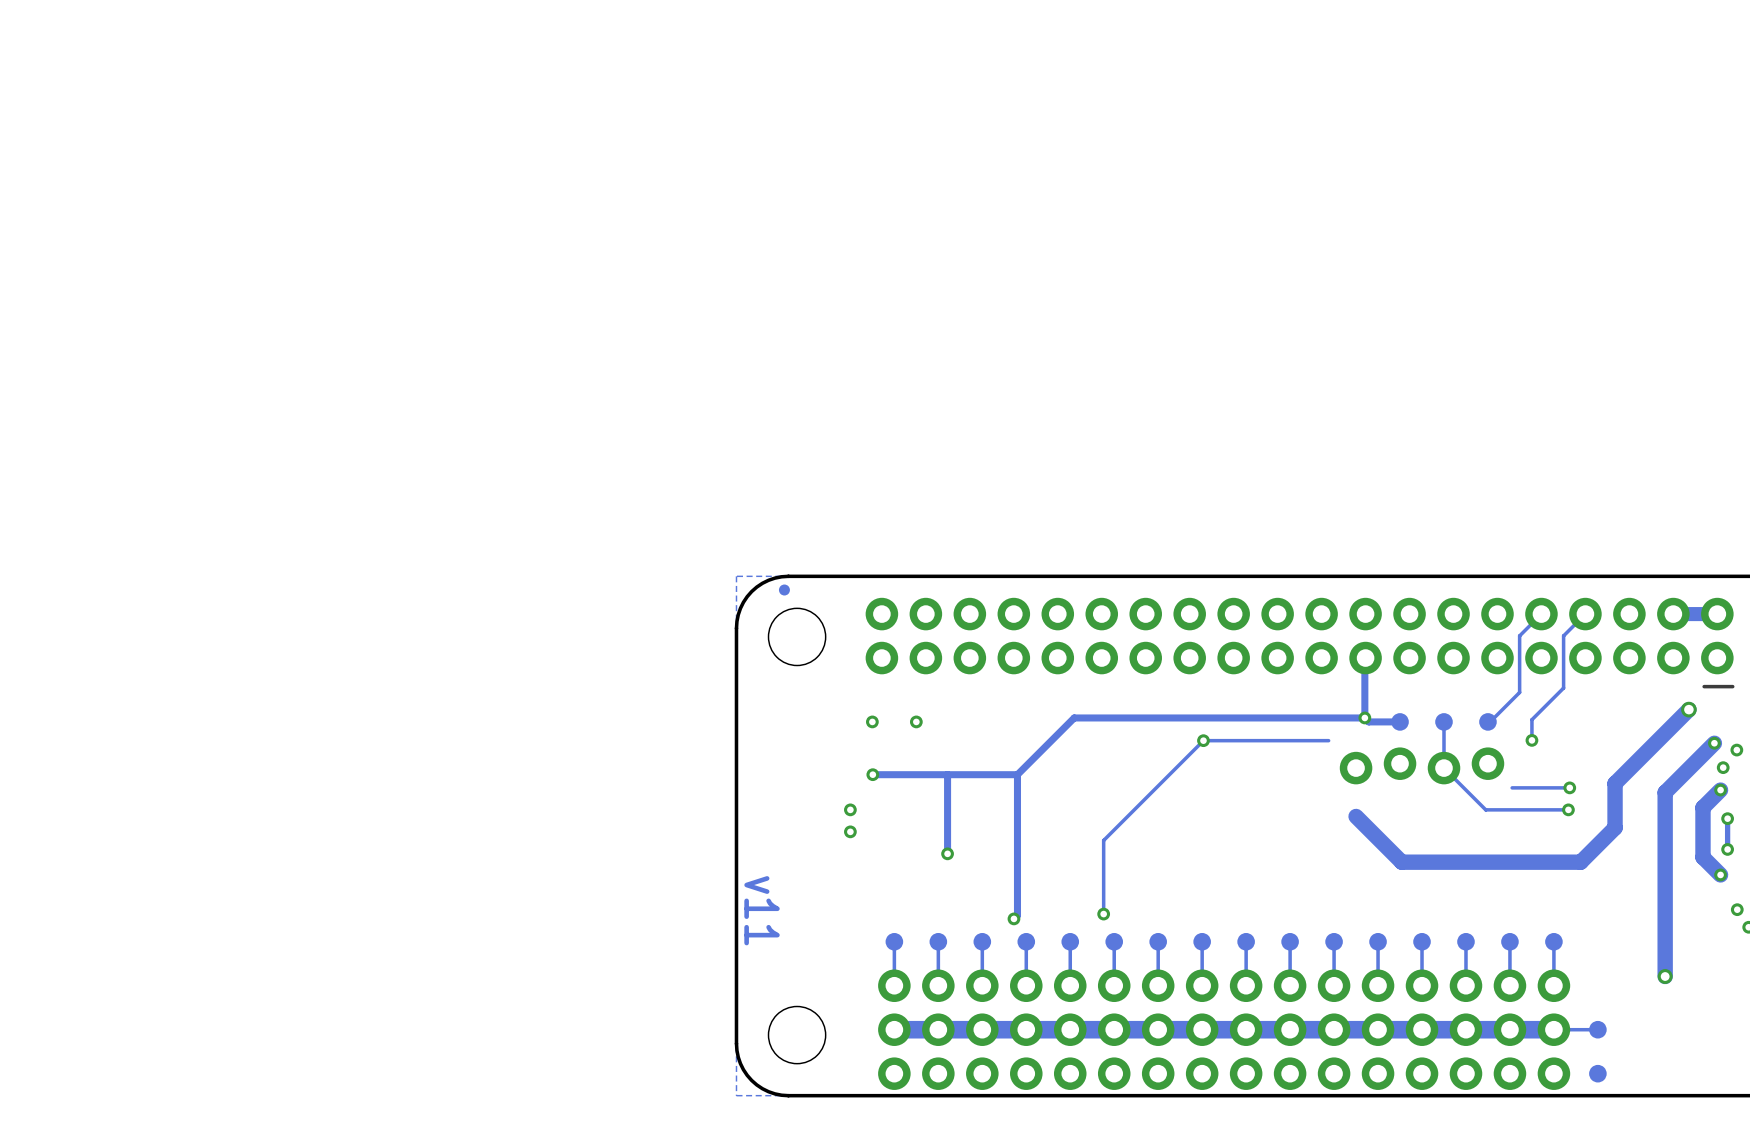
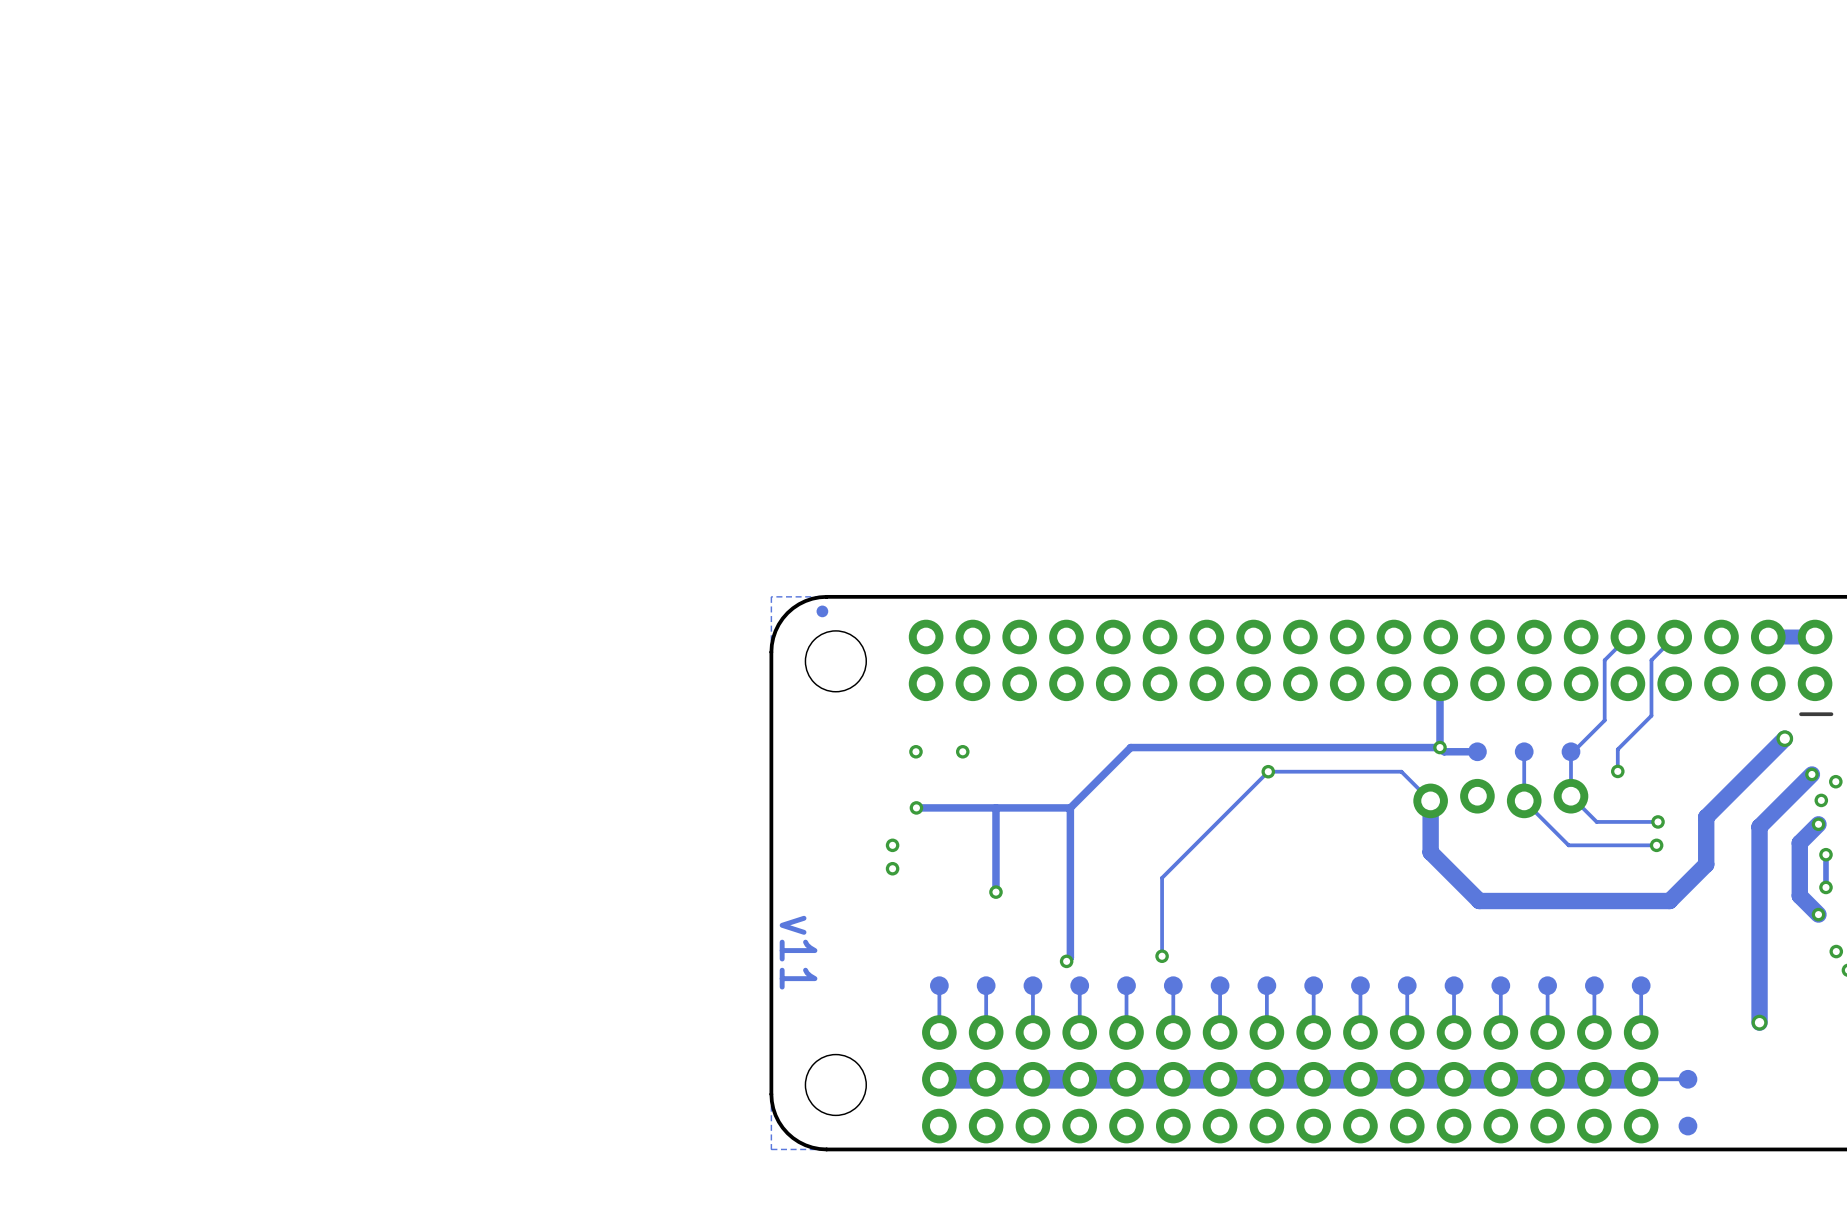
track: none -> (1570, 751) (1570, 796) (1596, 821)
track: none -> (1401, 771) (1430, 800) (1430, 852)

